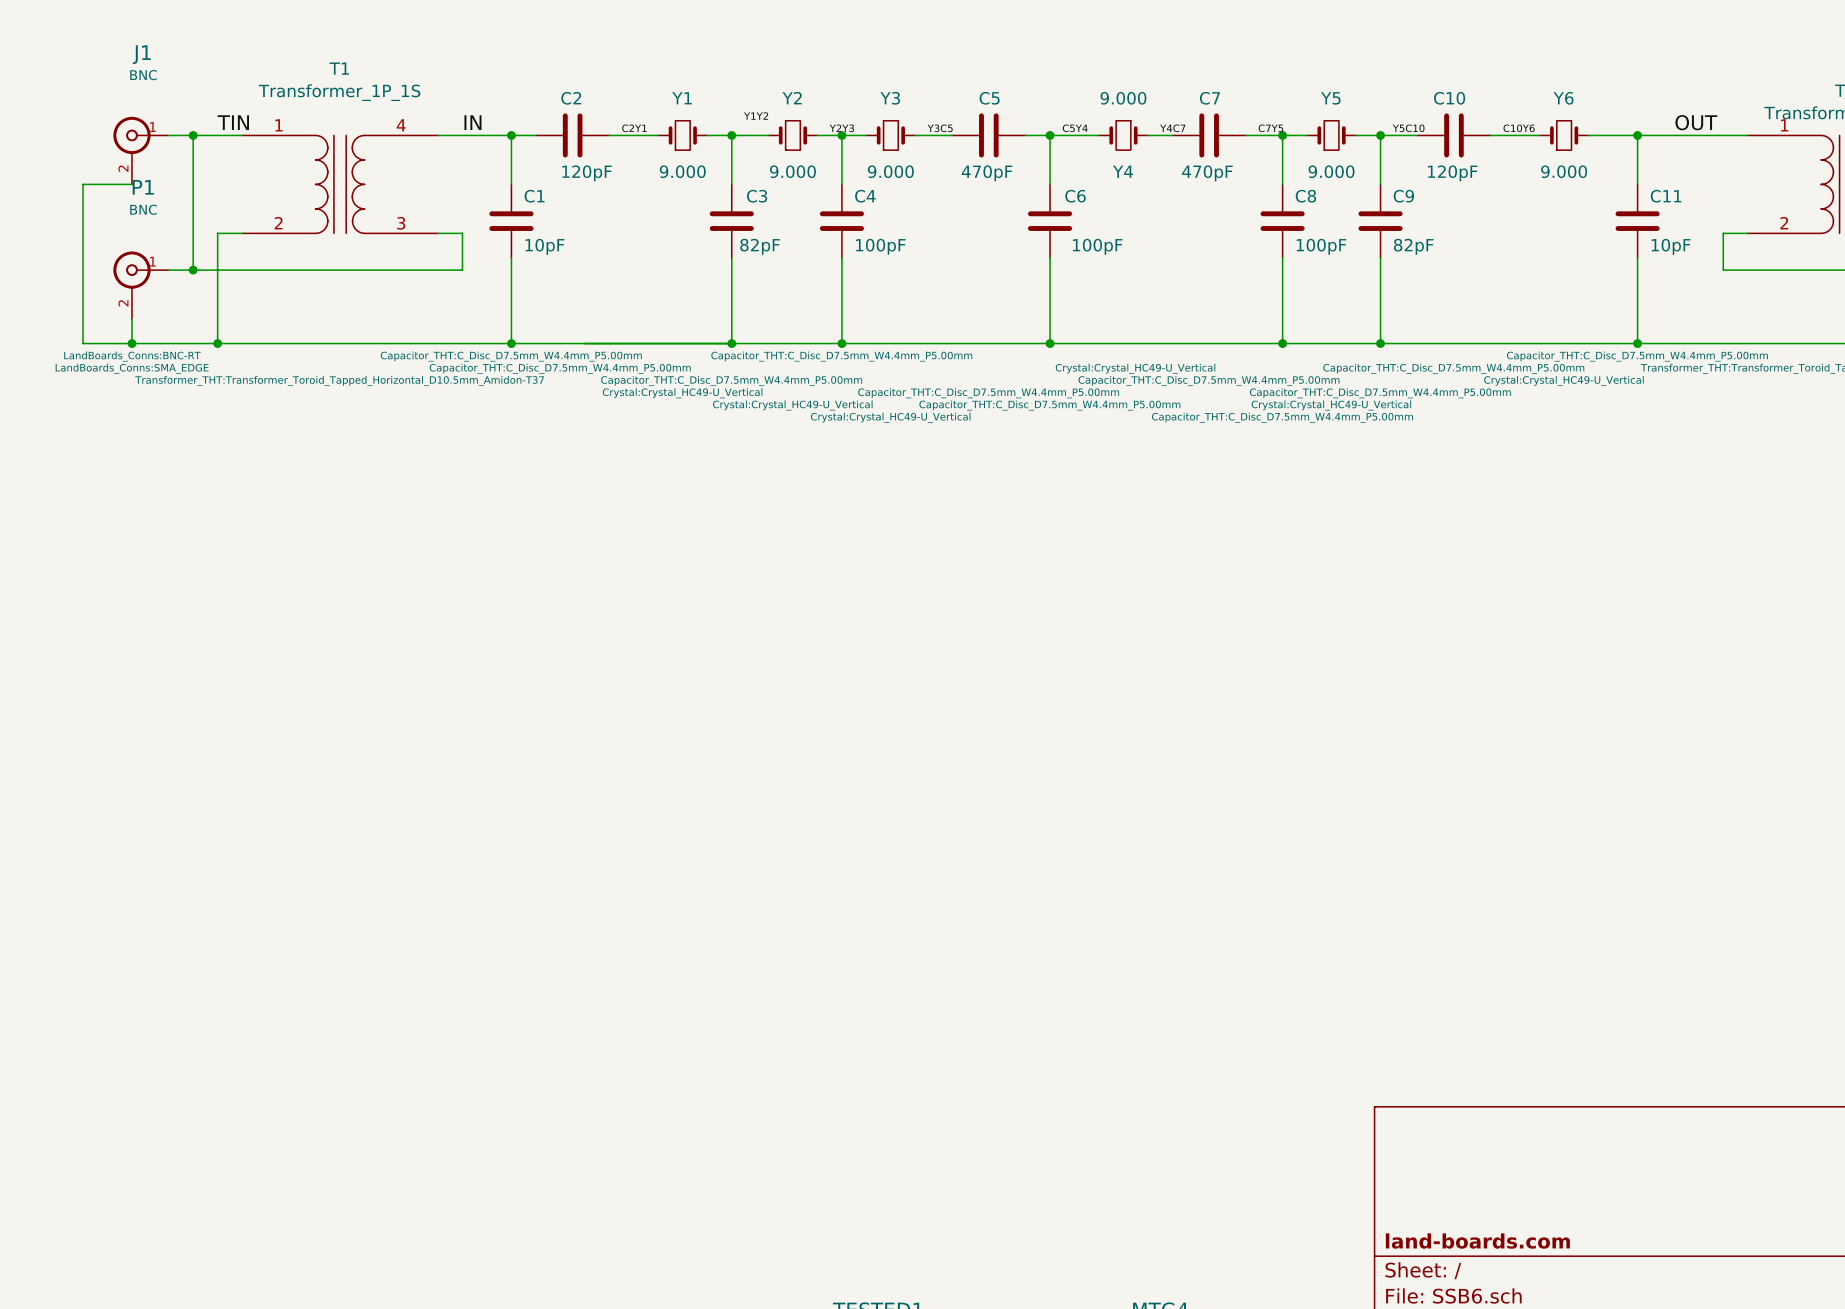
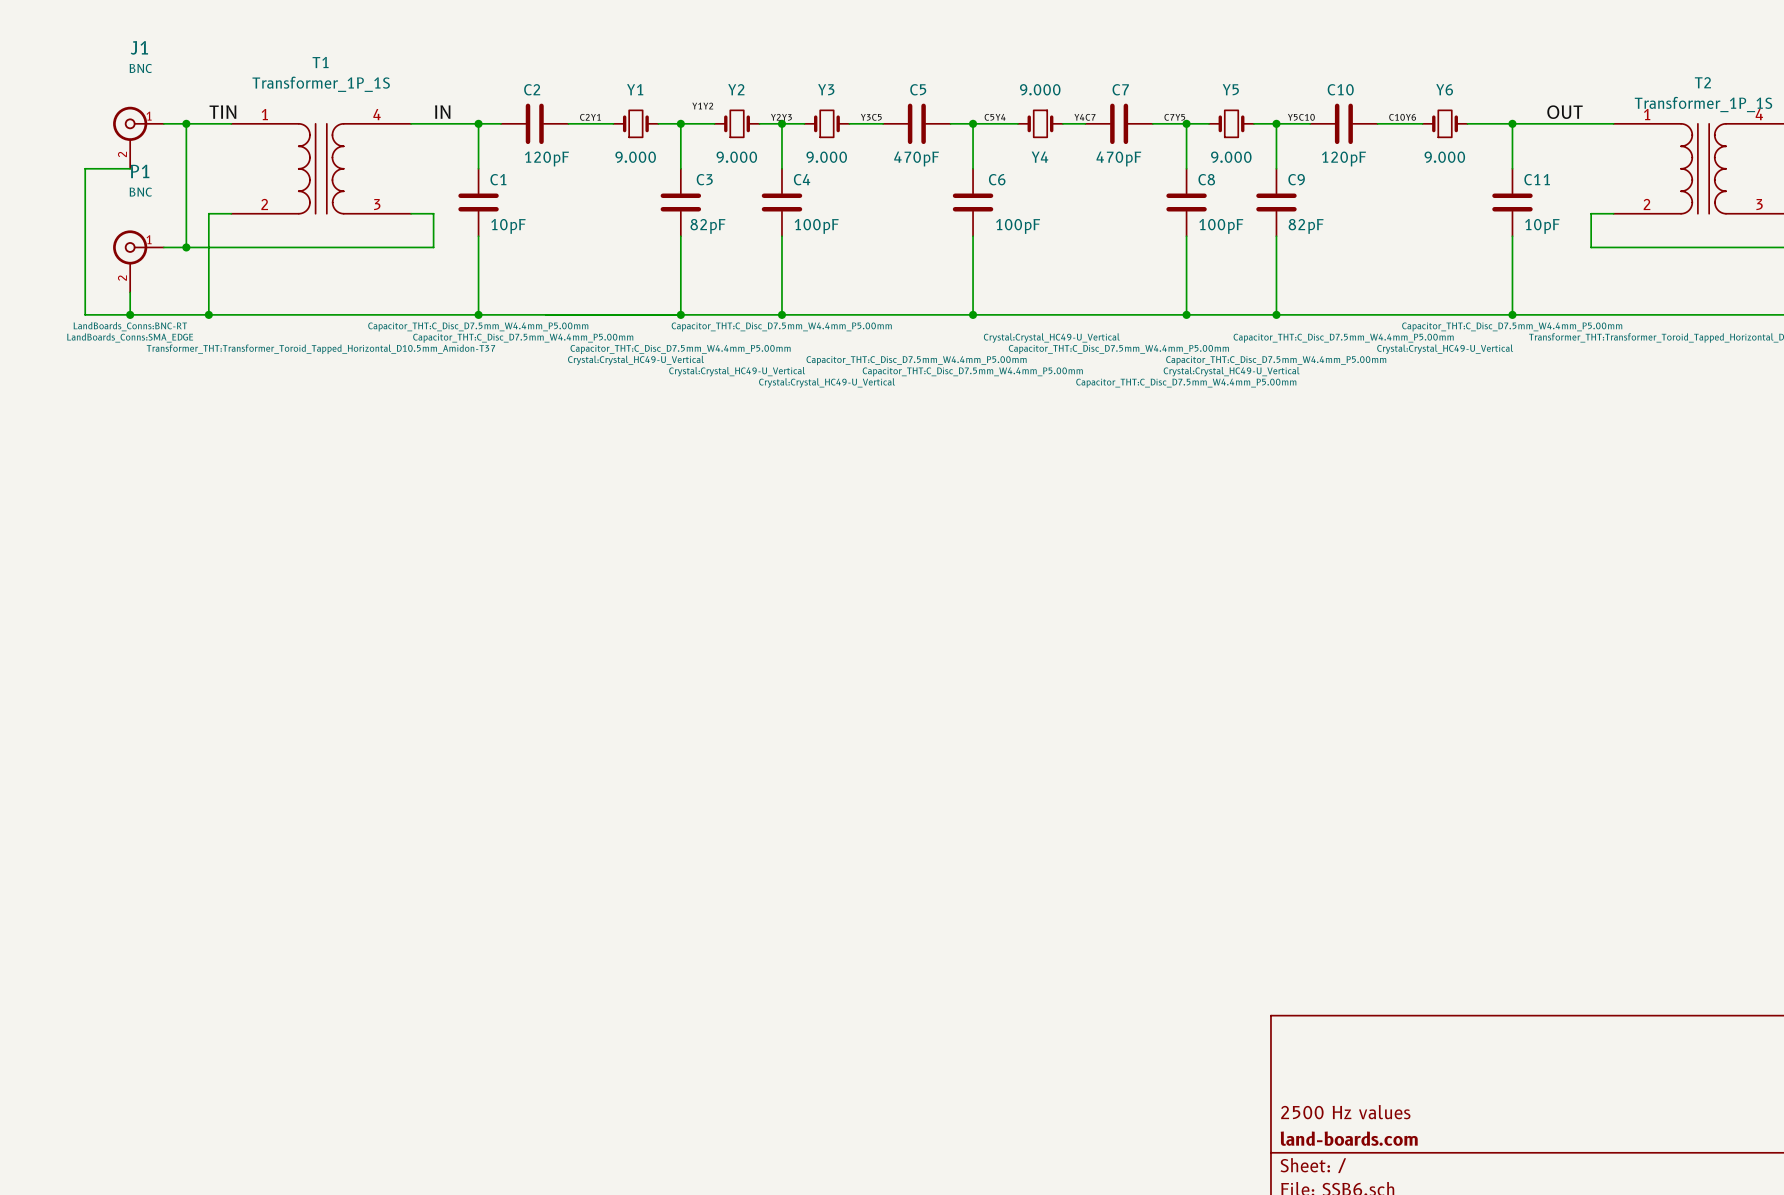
title block: none -> 2500 Hz values (1345, 1112)

